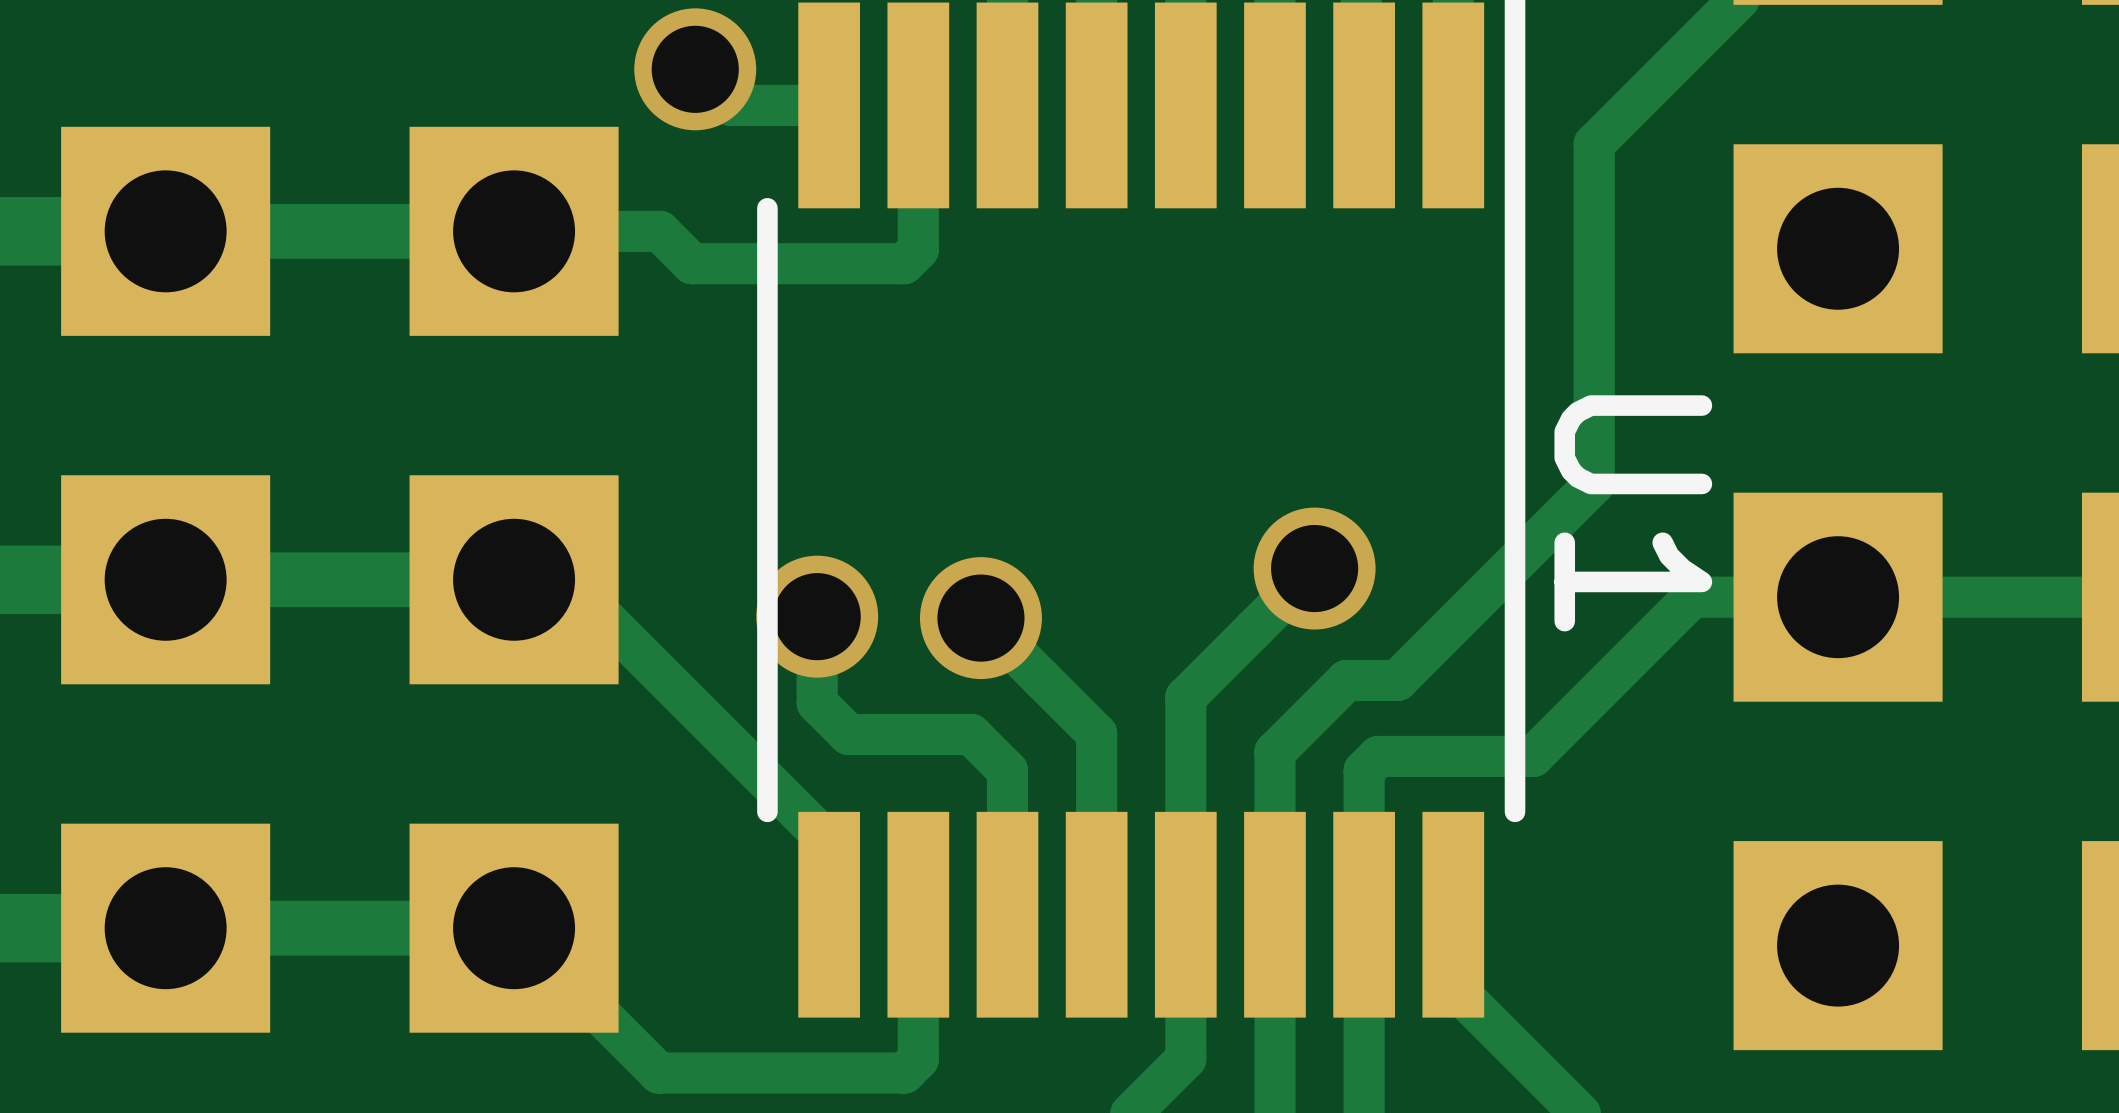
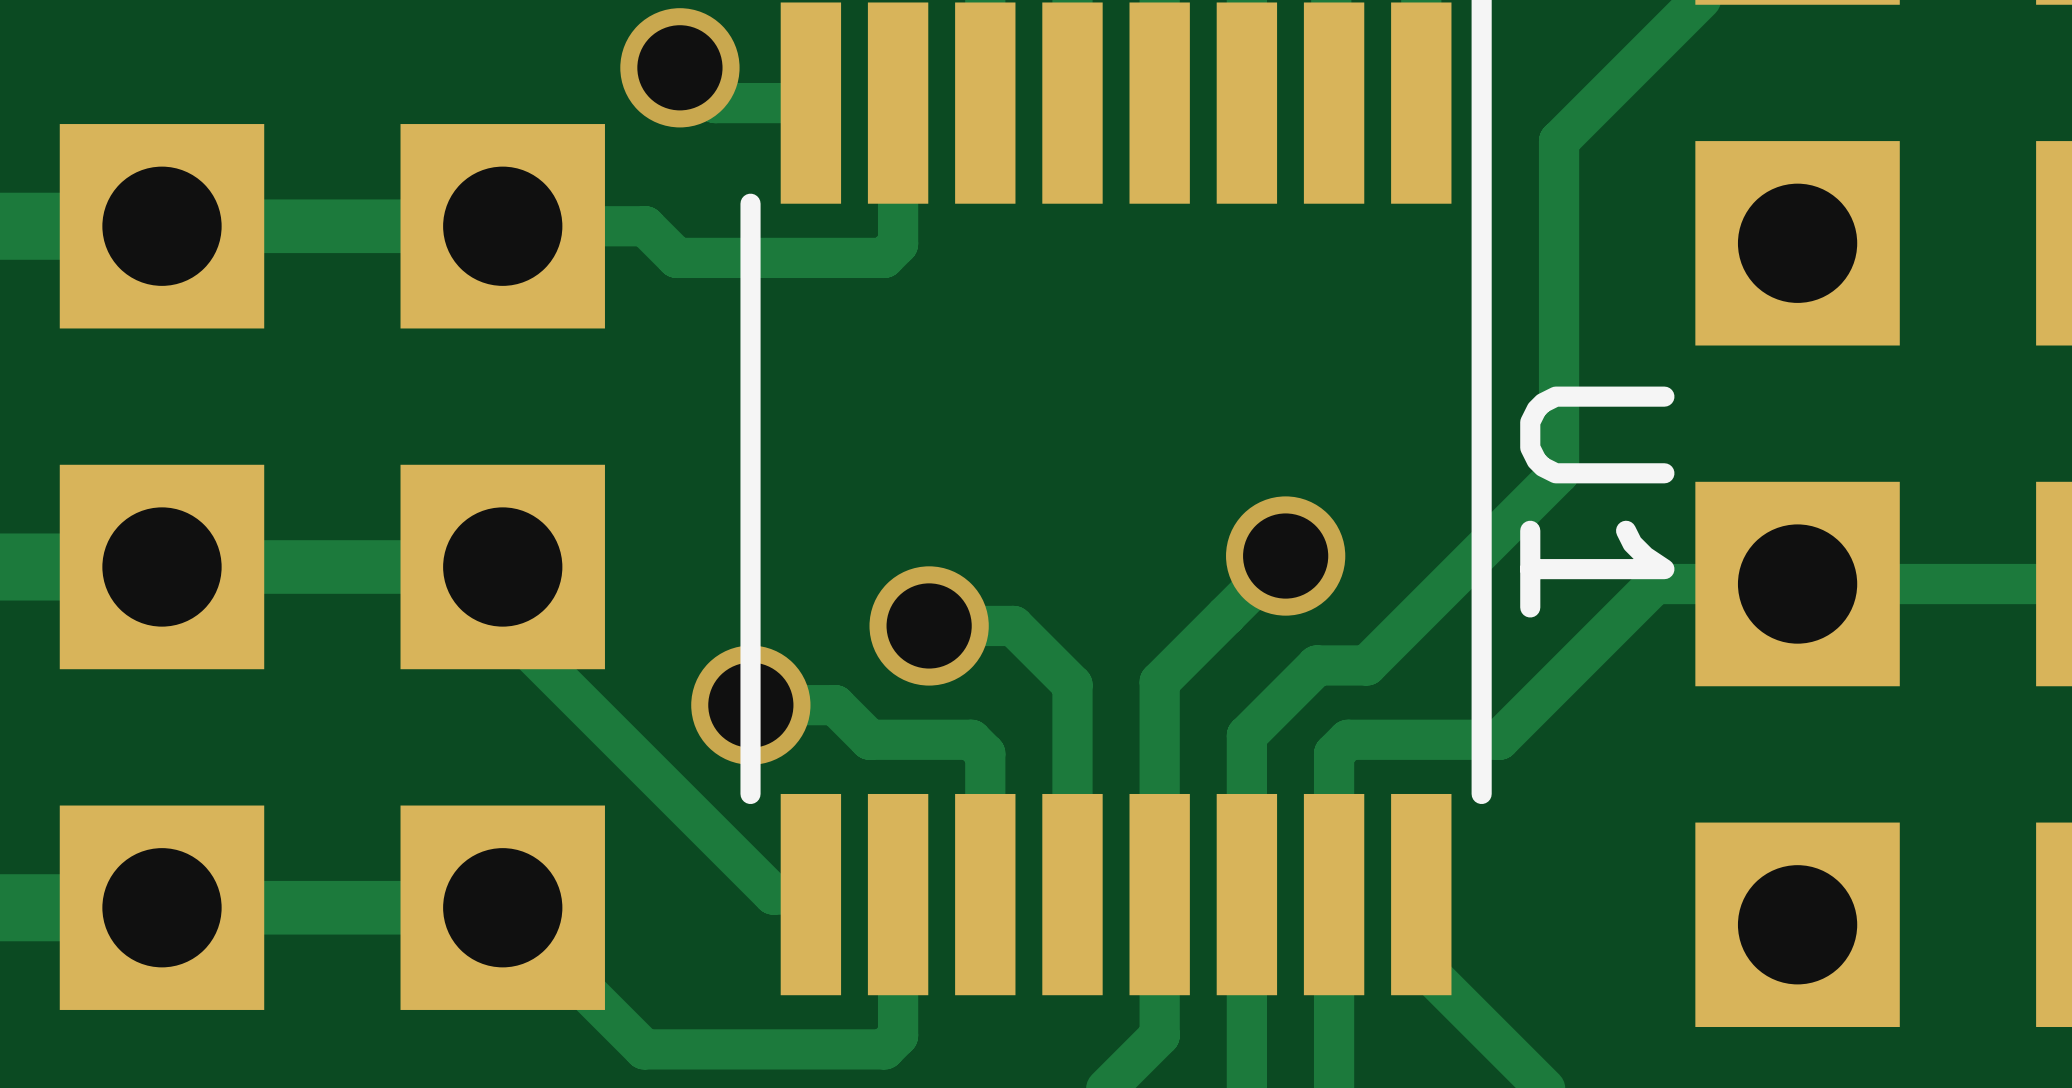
track: (514, 579) (566, 579) (829, 842) (829, 914) -> (502, 567) (502, 623) (773, 894) (810, 894)
track: (817, 616) (817, 702) (848, 734) (971, 734) (993, 756) -> (750, 705) (835, 705) (869, 739) (971, 739)
via position: (817, 616) -> (750, 705)
track: (980, 618) (1096, 733) -> (929, 625) (1013, 625) (1072, 684) (1072, 717)
via position: (980, 618) -> (929, 625)

